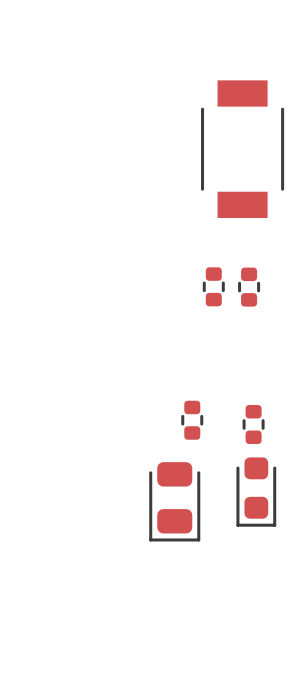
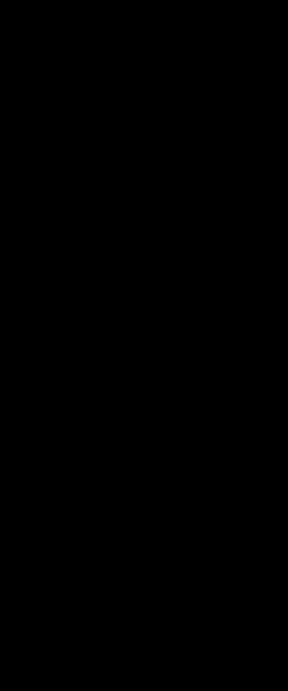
part: (242, 149) -> none
part: (213, 286) -> none
part: (249, 287) -> none
part: (192, 420) -> none
part: (253, 424) -> none
part: (256, 492) -> none
part: (174, 501) -> none

